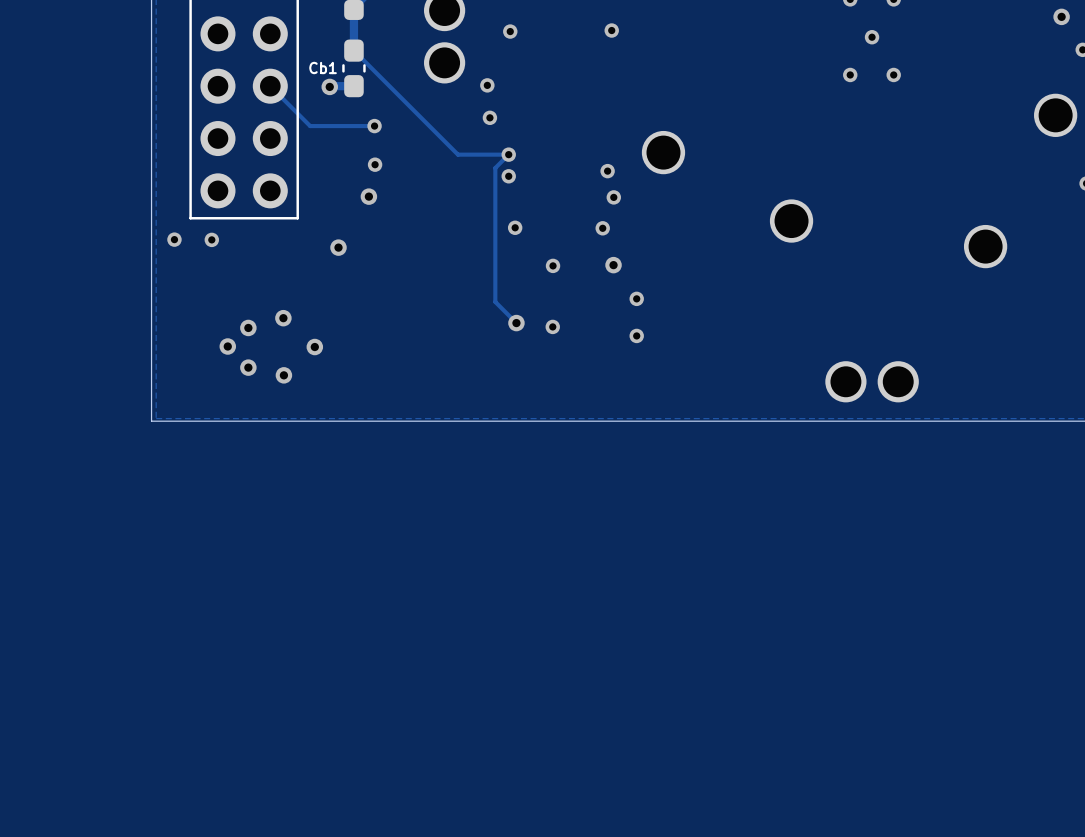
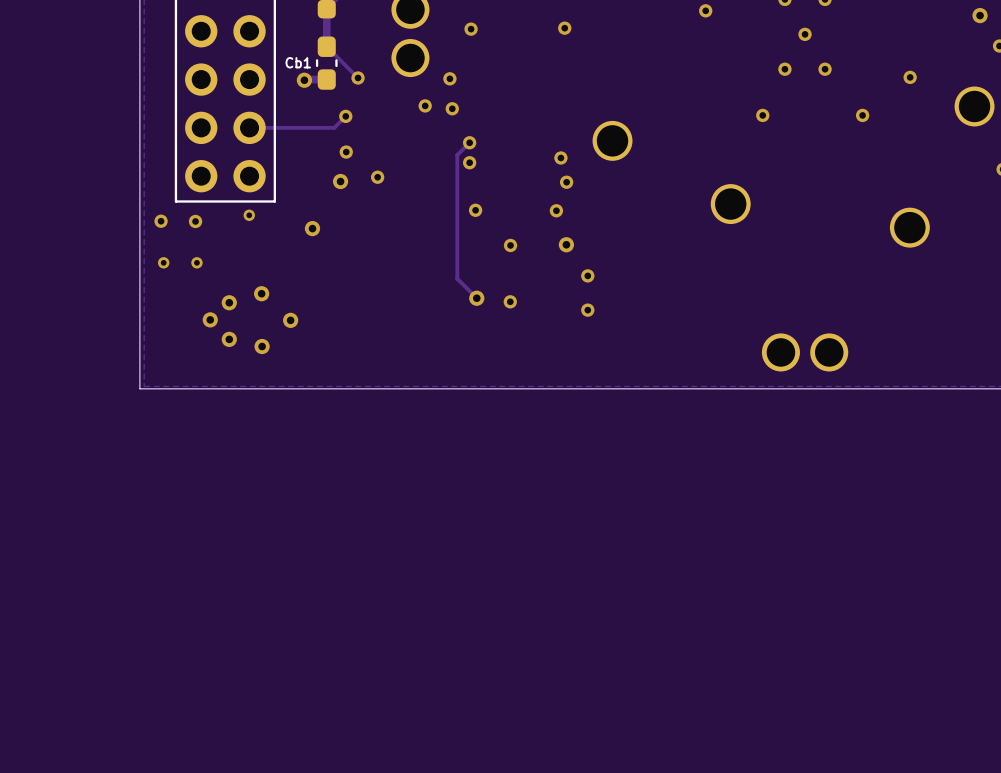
via: none -> (705, 10)
via: none -> (910, 77)
track: (387, 84) (457, 154) (508, 154) -> none
via: none -> (358, 77)
track: (270, 86) (310, 126) (374, 126) -> (249, 127) (334, 127) (345, 116)
via: none -> (425, 105)
via: none -> (762, 115)
via: none -> (862, 115)
via: none -> (377, 177)
via: none -> (249, 215)
via: none -> (163, 262)
via: none -> (196, 262)

